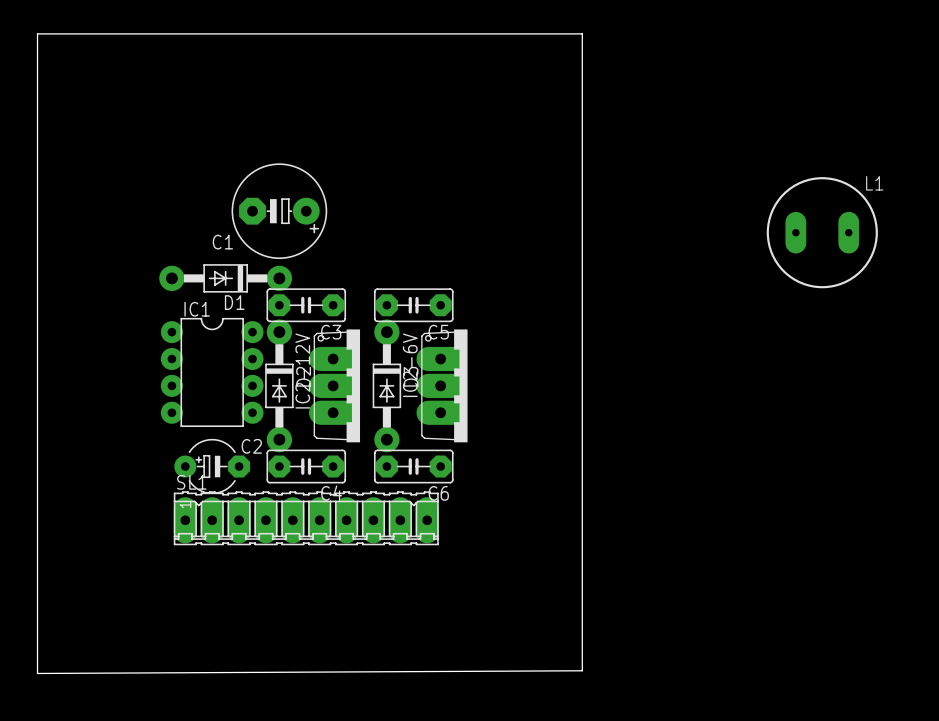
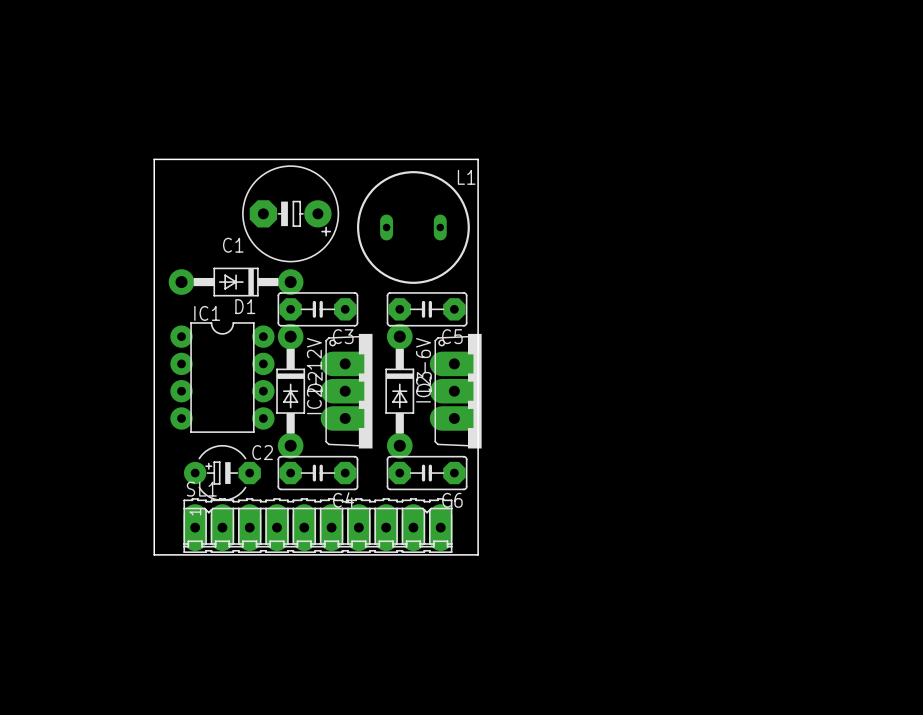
board edge: (37, 33) (582, 33) (582, 670) (37, 673) (37, 33) -> none
board edge: none -> (154, 159) (478, 159) (478, 554) (154, 554) (154, 159)
L1 footprint: [766, 177, 878, 289] -> [357, 171, 470, 284]

